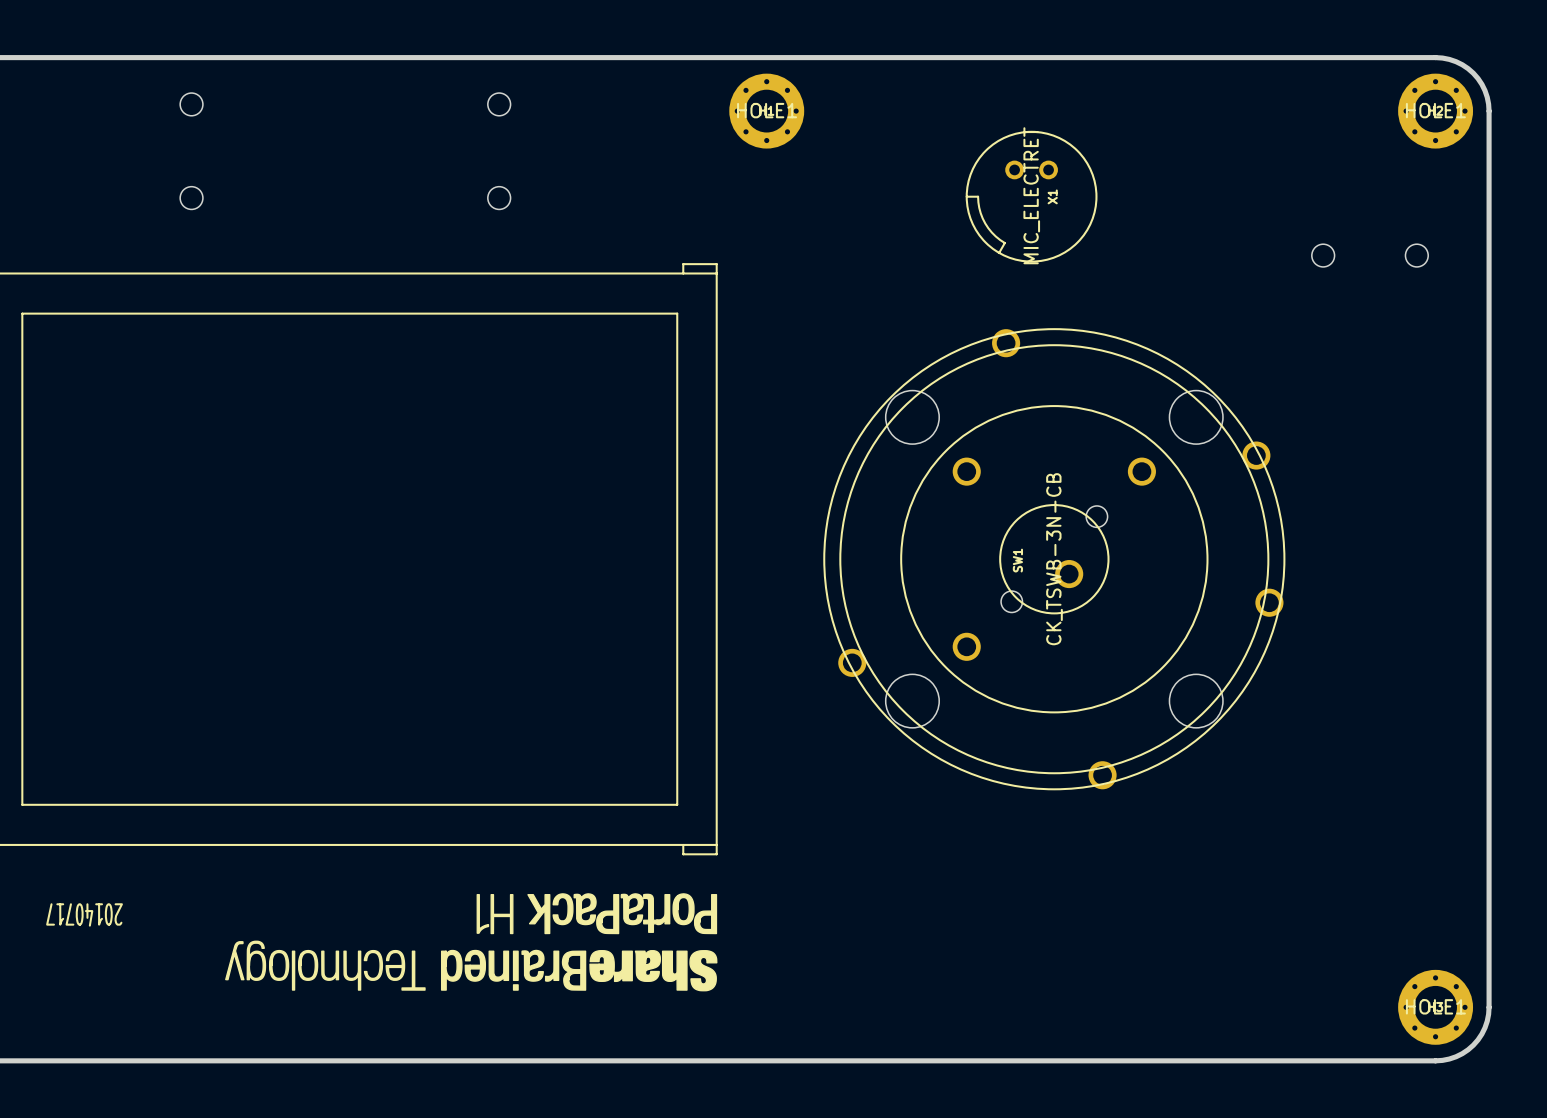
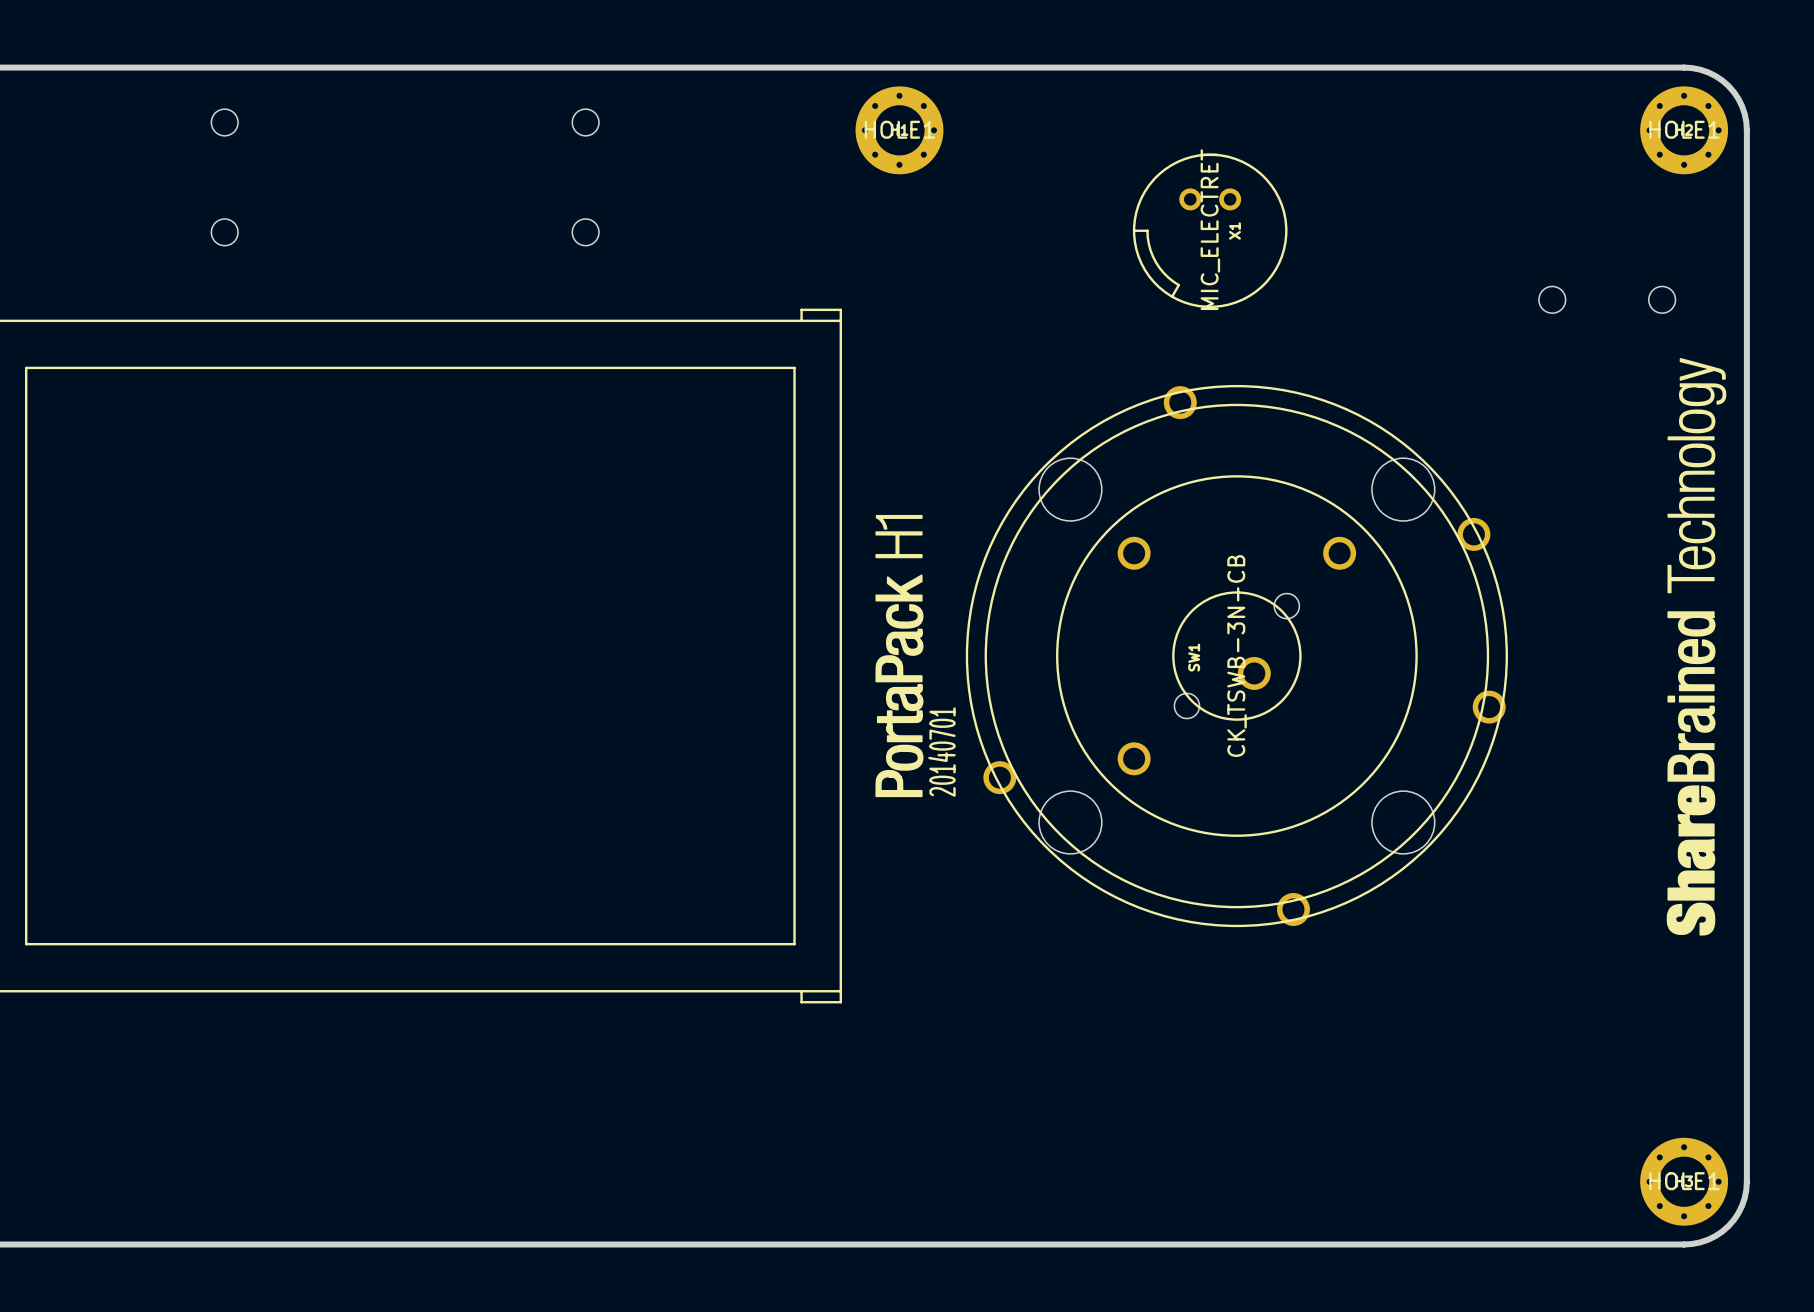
drawing: none -> [1666, 358, 1727, 936]
drawing: none -> [875, 514, 924, 798]
text: none -> 20140701 (941, 752)
drawing: [225, 893, 718, 992] -> none
text: 20140717 (84, 914) -> none

